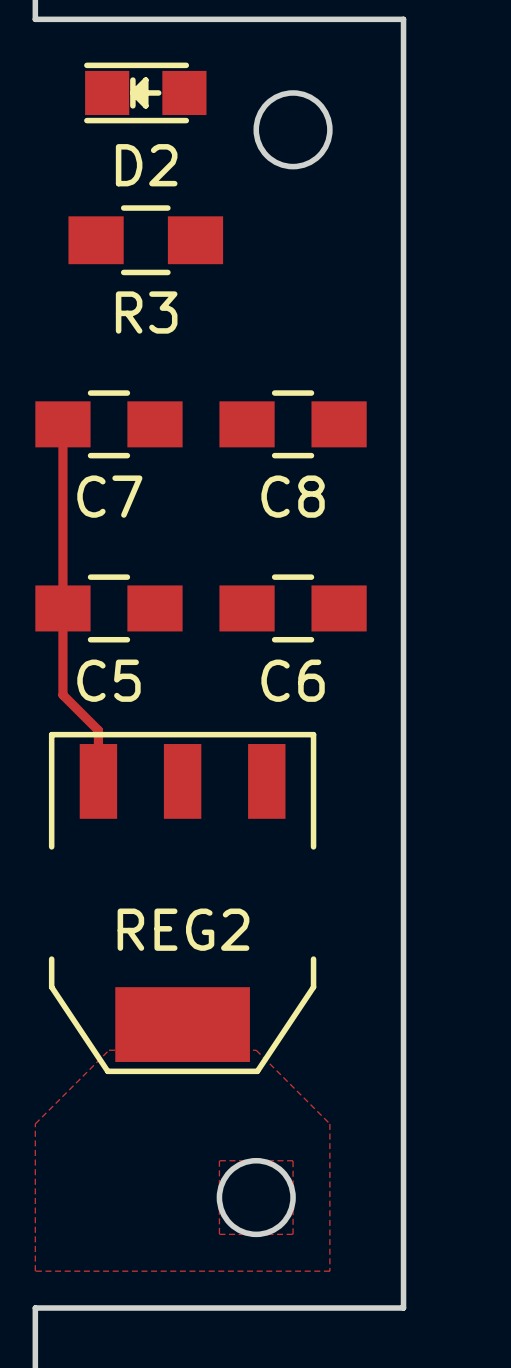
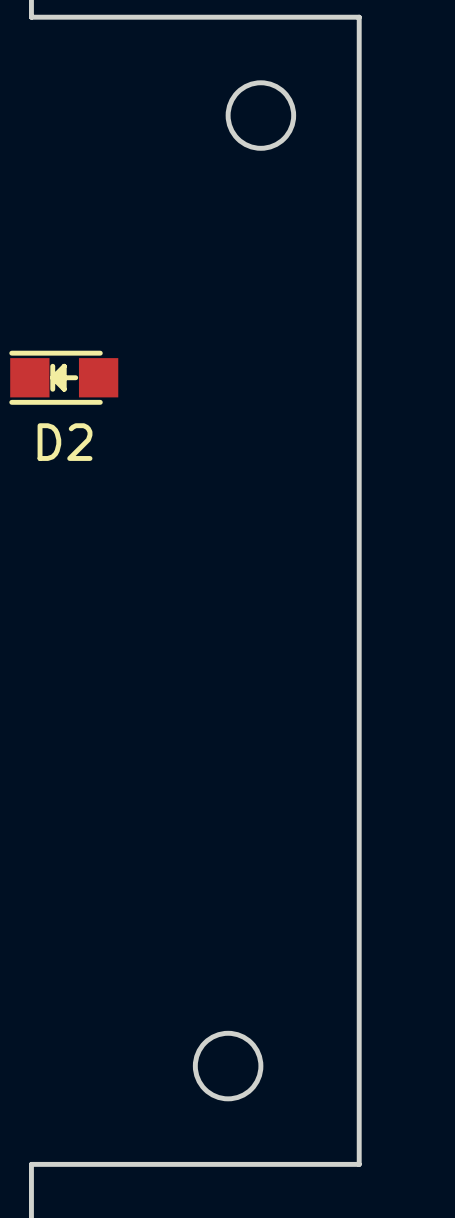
D2 position: (145, 92) -> (63, 377)
R3: (145, 240) -> none
track: (62, 424) (62, 694) (98, 730) (98, 781) -> none
C7: (108, 424) -> none
C8: (293, 424) -> none
C5: (108, 608) -> none
C6: (293, 608) -> none
REG2: (182, 902) -> none
zone outline: (108, 1050) (35, 1123) (35, 1271) (329, 1271) (329, 1123) (256, 1050) (108, 1050) -> none
zone outline: (219, 1160) (219, 1234) (293, 1234) (293, 1160) (219, 1160) -> none

